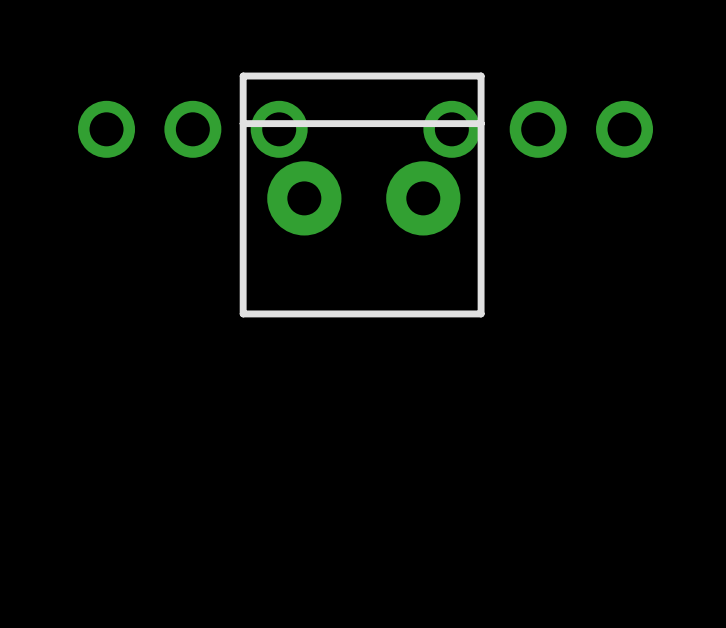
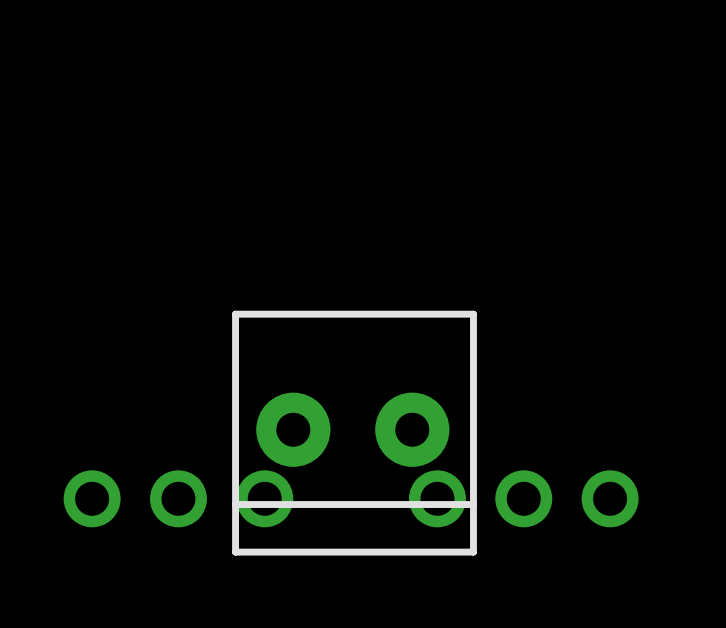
part rotation: 0° (365, 194) -> 180° (351, 433)

